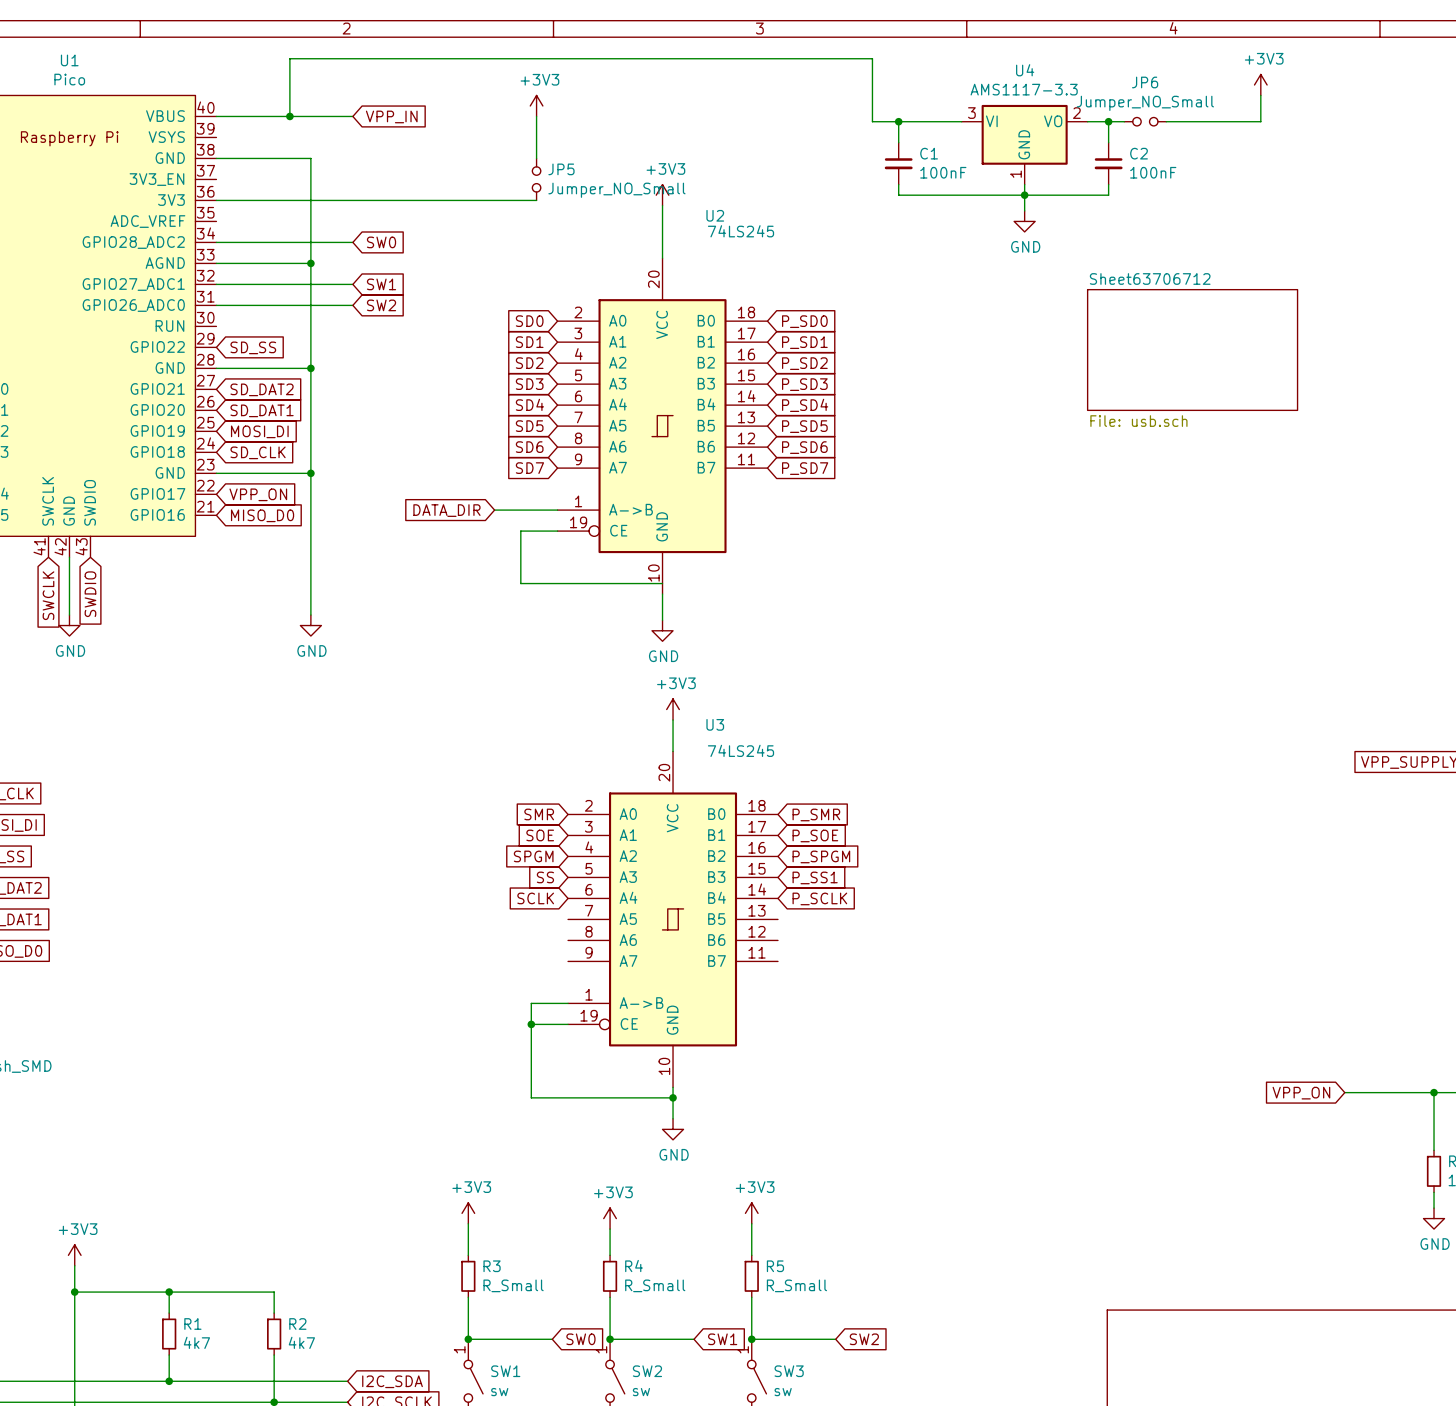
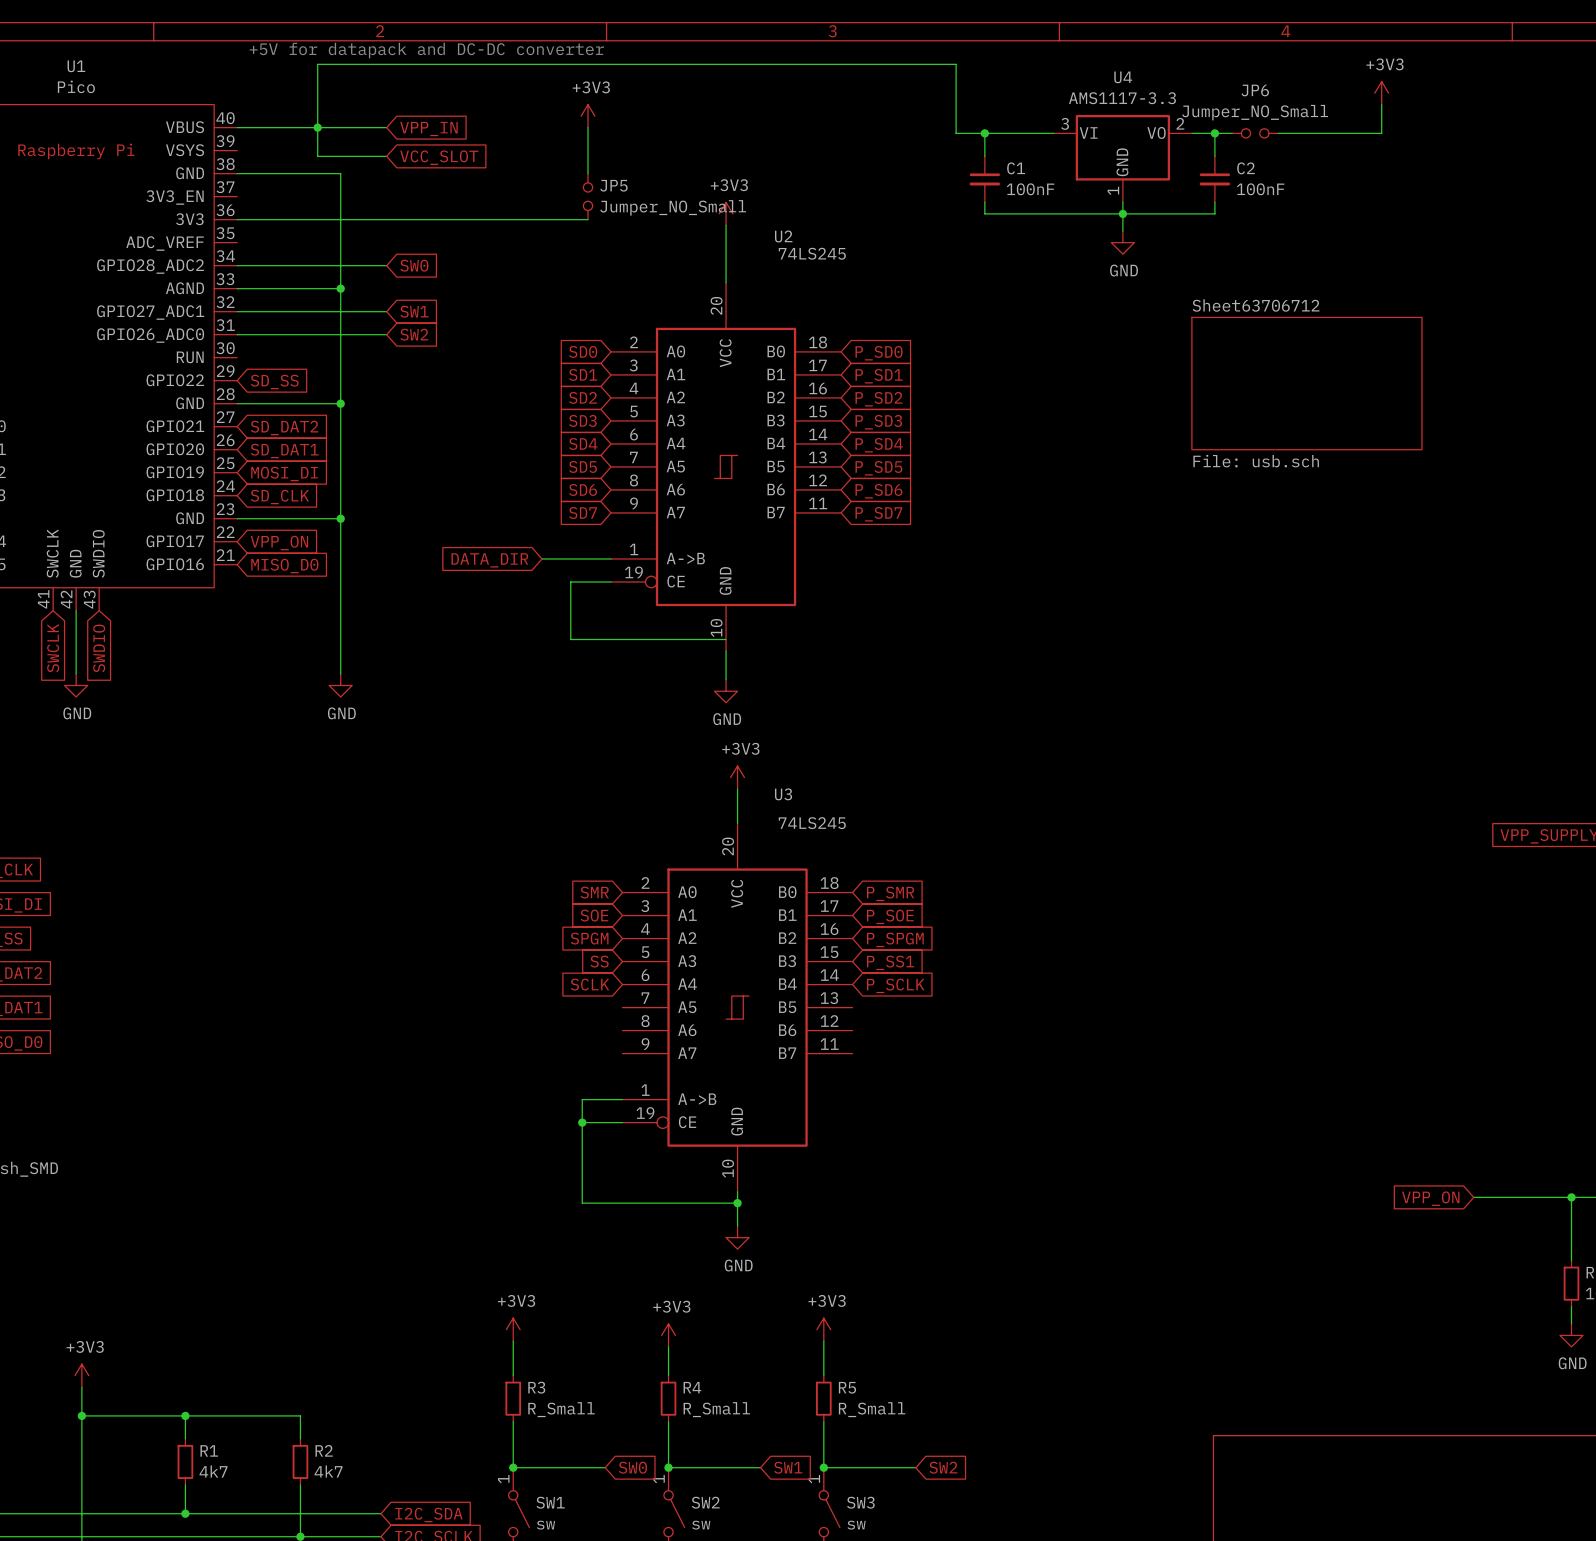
text: none -> +5V for datapack and DC-DC converter (426, 50)
wire: none -> (317, 127) (317, 156) (386, 156)
global label: none -> VCC_SLOT (439, 157)

